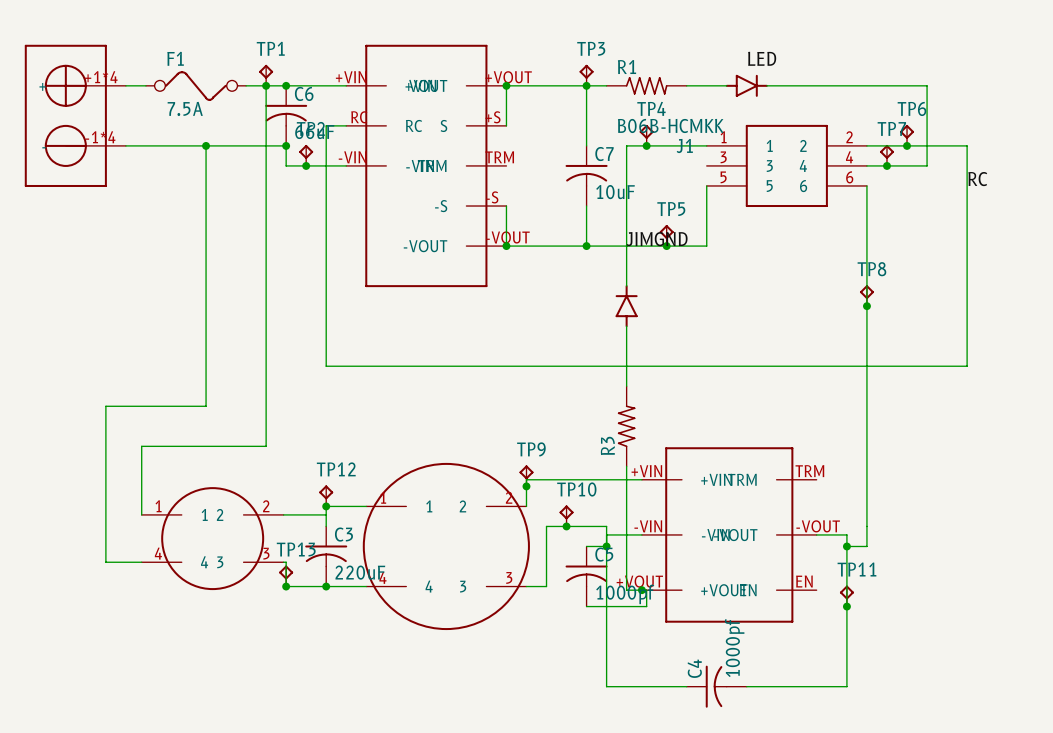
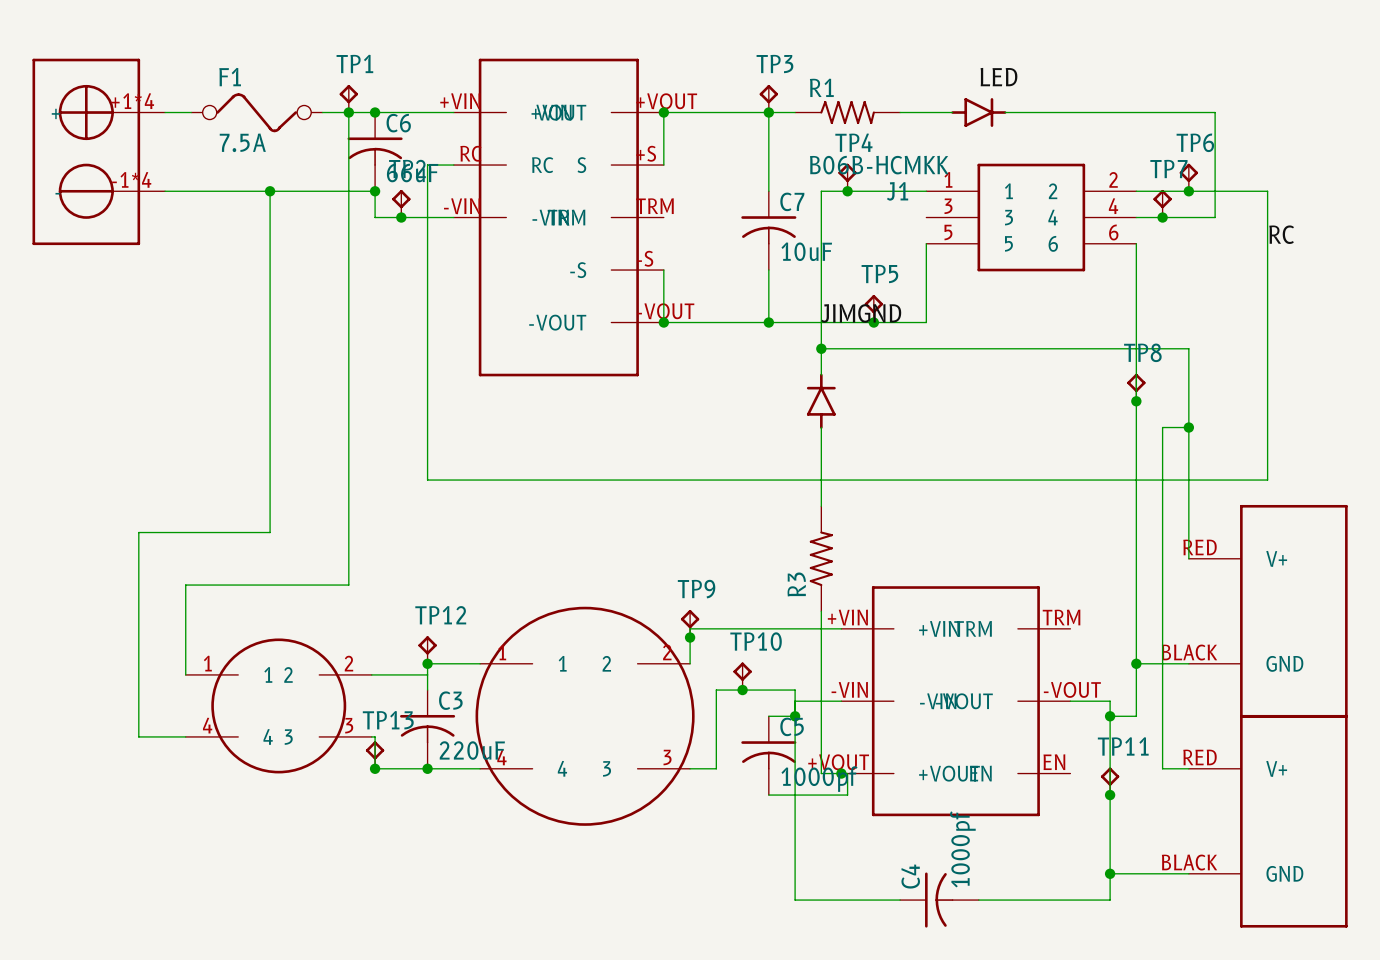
wire: none -> (821, 348) (1188, 348) (1188, 558)
junction: none -> (821, 348)
wire: none -> (1188, 427) (1162, 427) (1162, 768) (1188, 768)
junction: none -> (1188, 427)
part: none -> (1268, 611)
wire: none -> (1136, 663) (1188, 663)
junction: none -> (1136, 663)
part: none -> (1268, 821)
wire: none -> (1110, 873) (1188, 873)
junction: none -> (1110, 873)

